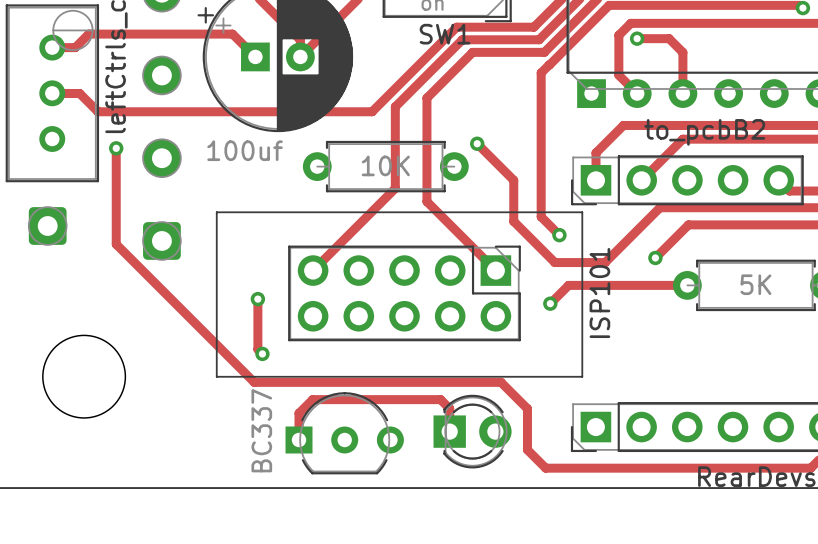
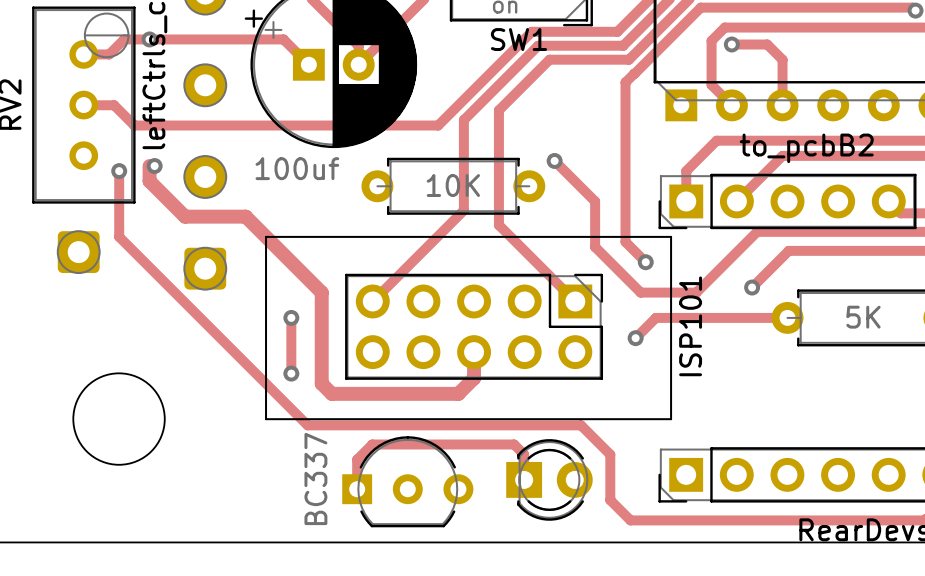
via: none -> (149, 39)
track: none -> (149, 166) (149, 181) (185, 216) (245, 216) (321, 292) (321, 383) (331, 393) (458, 393) (474, 378) (474, 352)
track: (116, 148) (116, 244) -> (119, 171) (119, 236) (154, 272)
via: none -> (119, 171)
track: none -> (291, 317) (291, 373)
via: none -> (291, 317)
track: (257, 299) (257, 349) (262, 353) -> none
via: (257, 299) -> none
via: none -> (291, 373)
via: (262, 353) -> none

